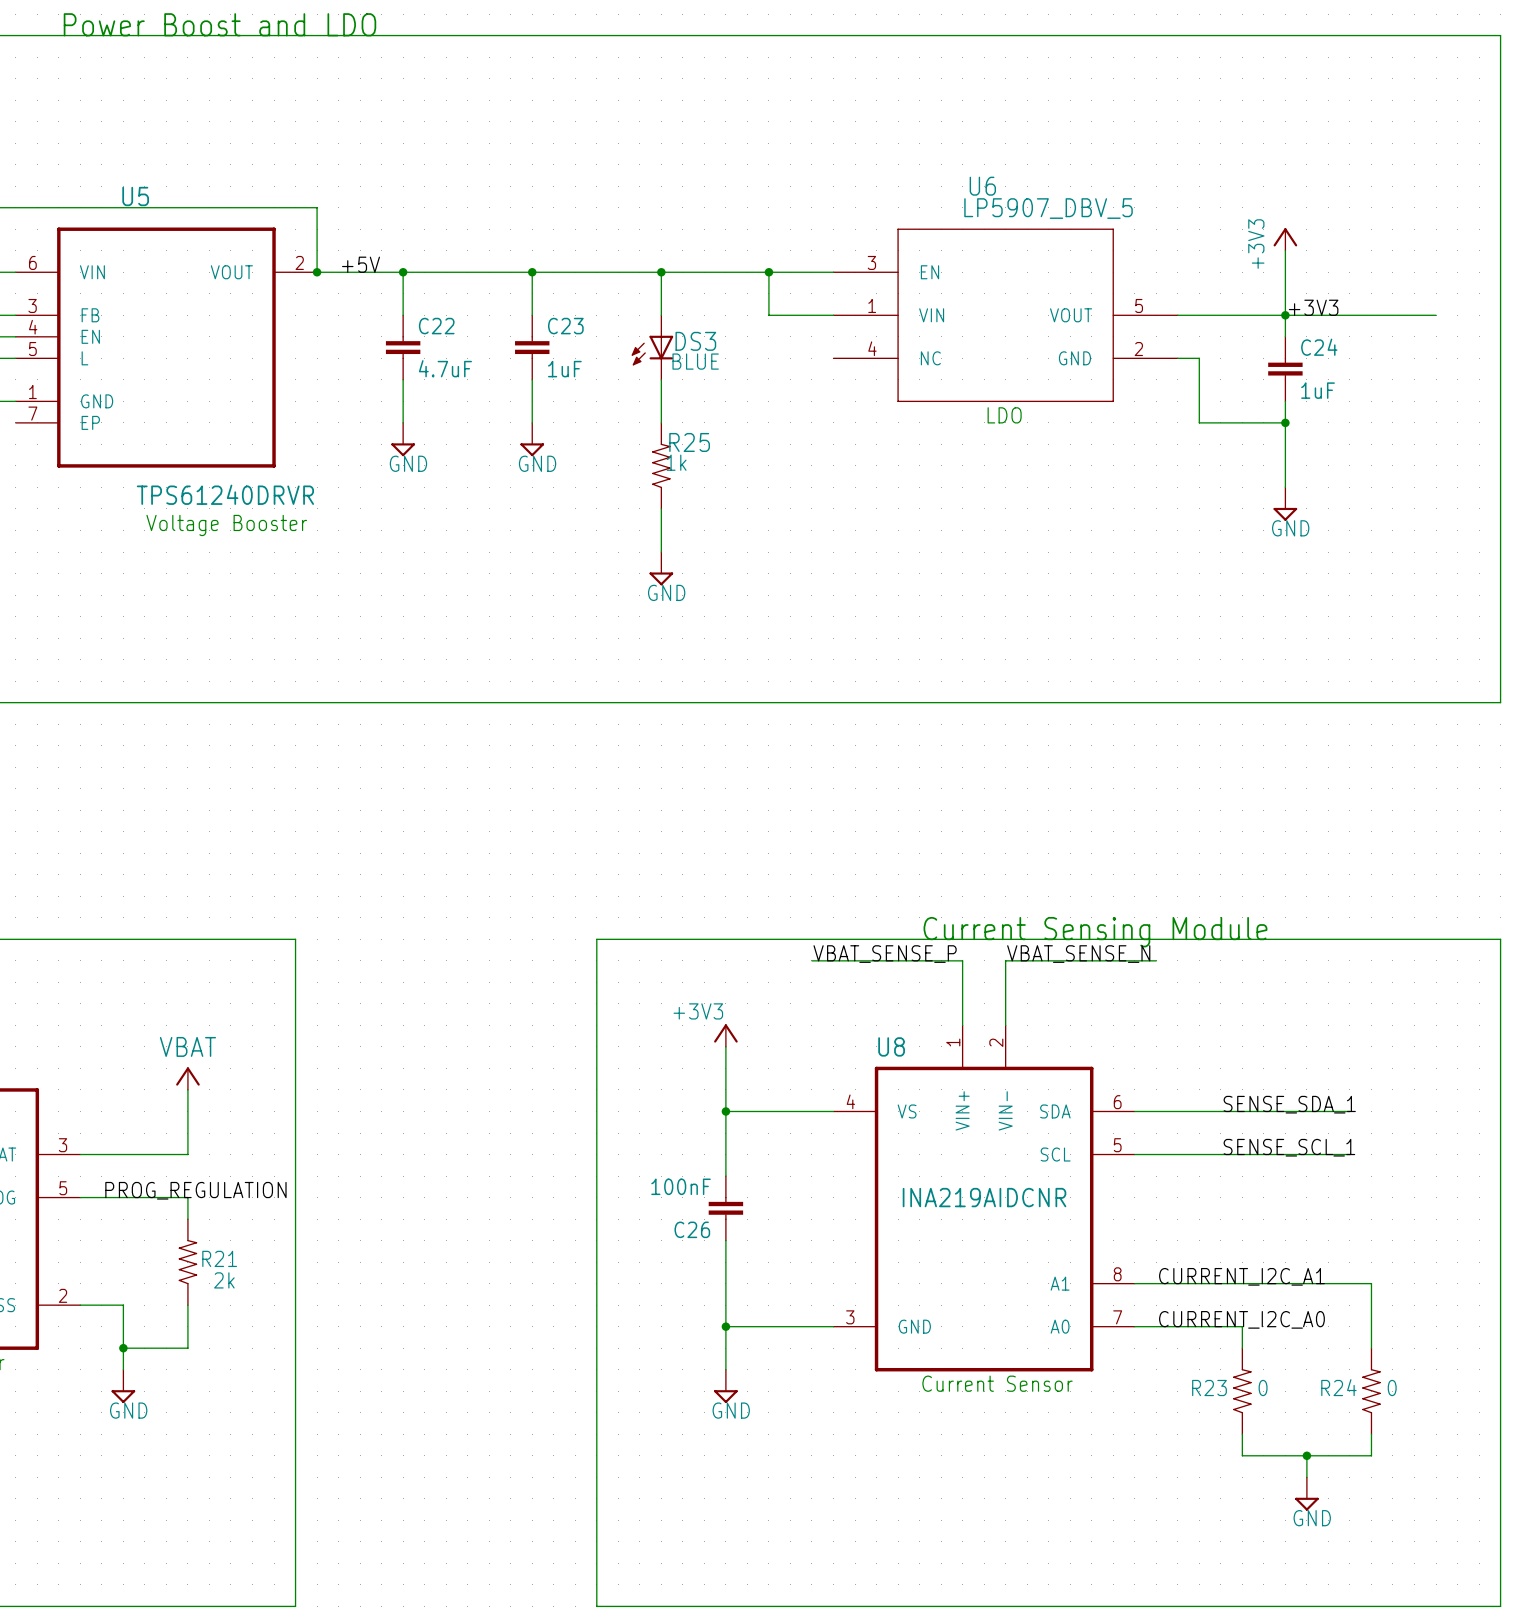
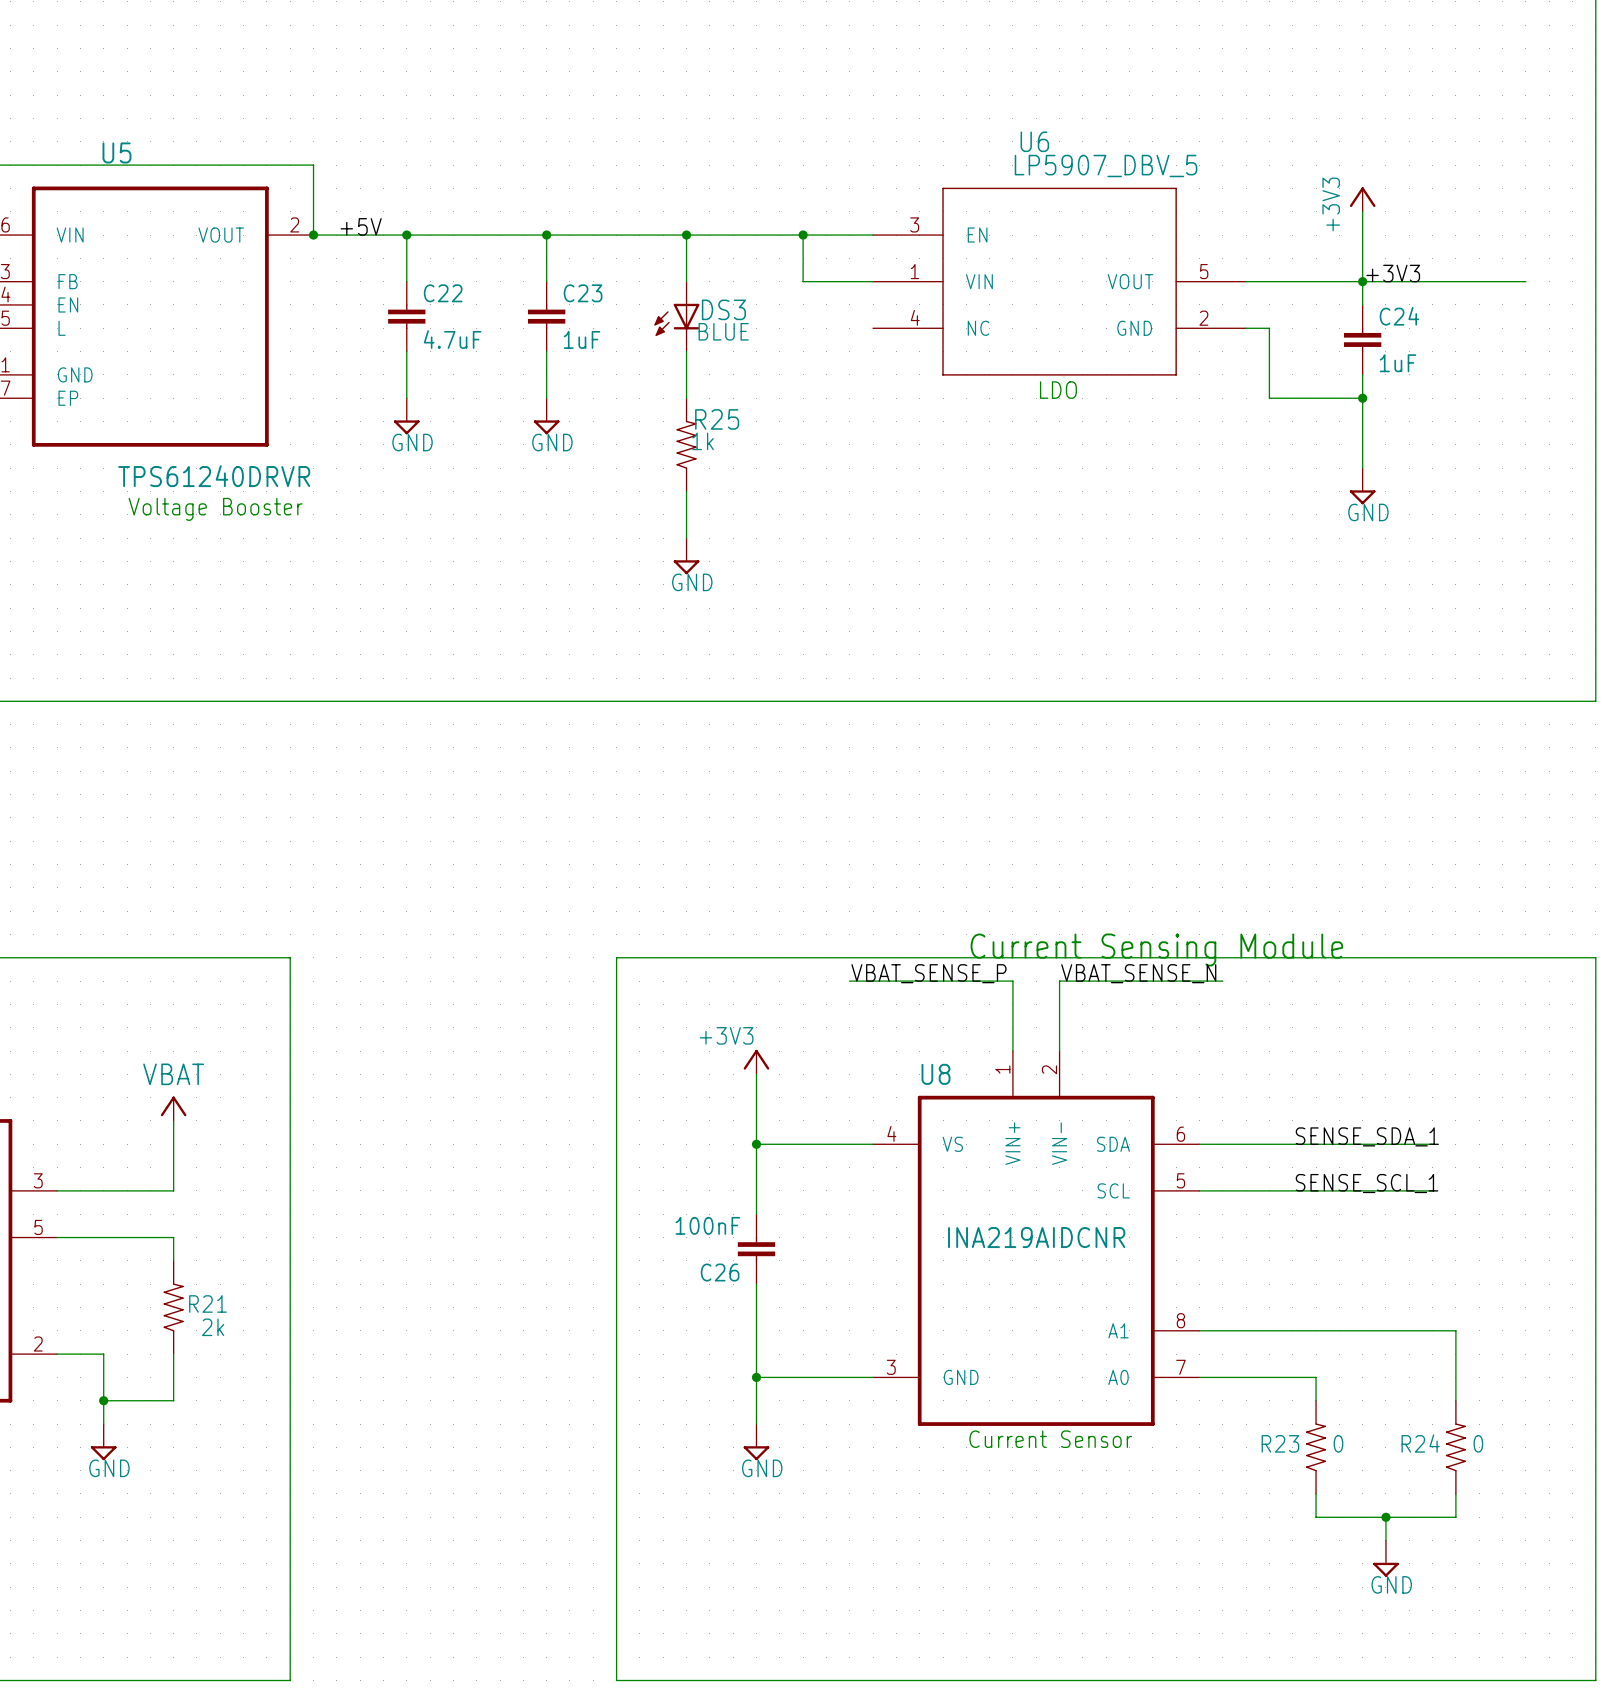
label: PROG_REGULATION (195, 1190) -> none
label: CURRENT_I2C_A1 (1241, 1276) -> none
label: CURRENT_I2C_A0 (1241, 1319) -> none

